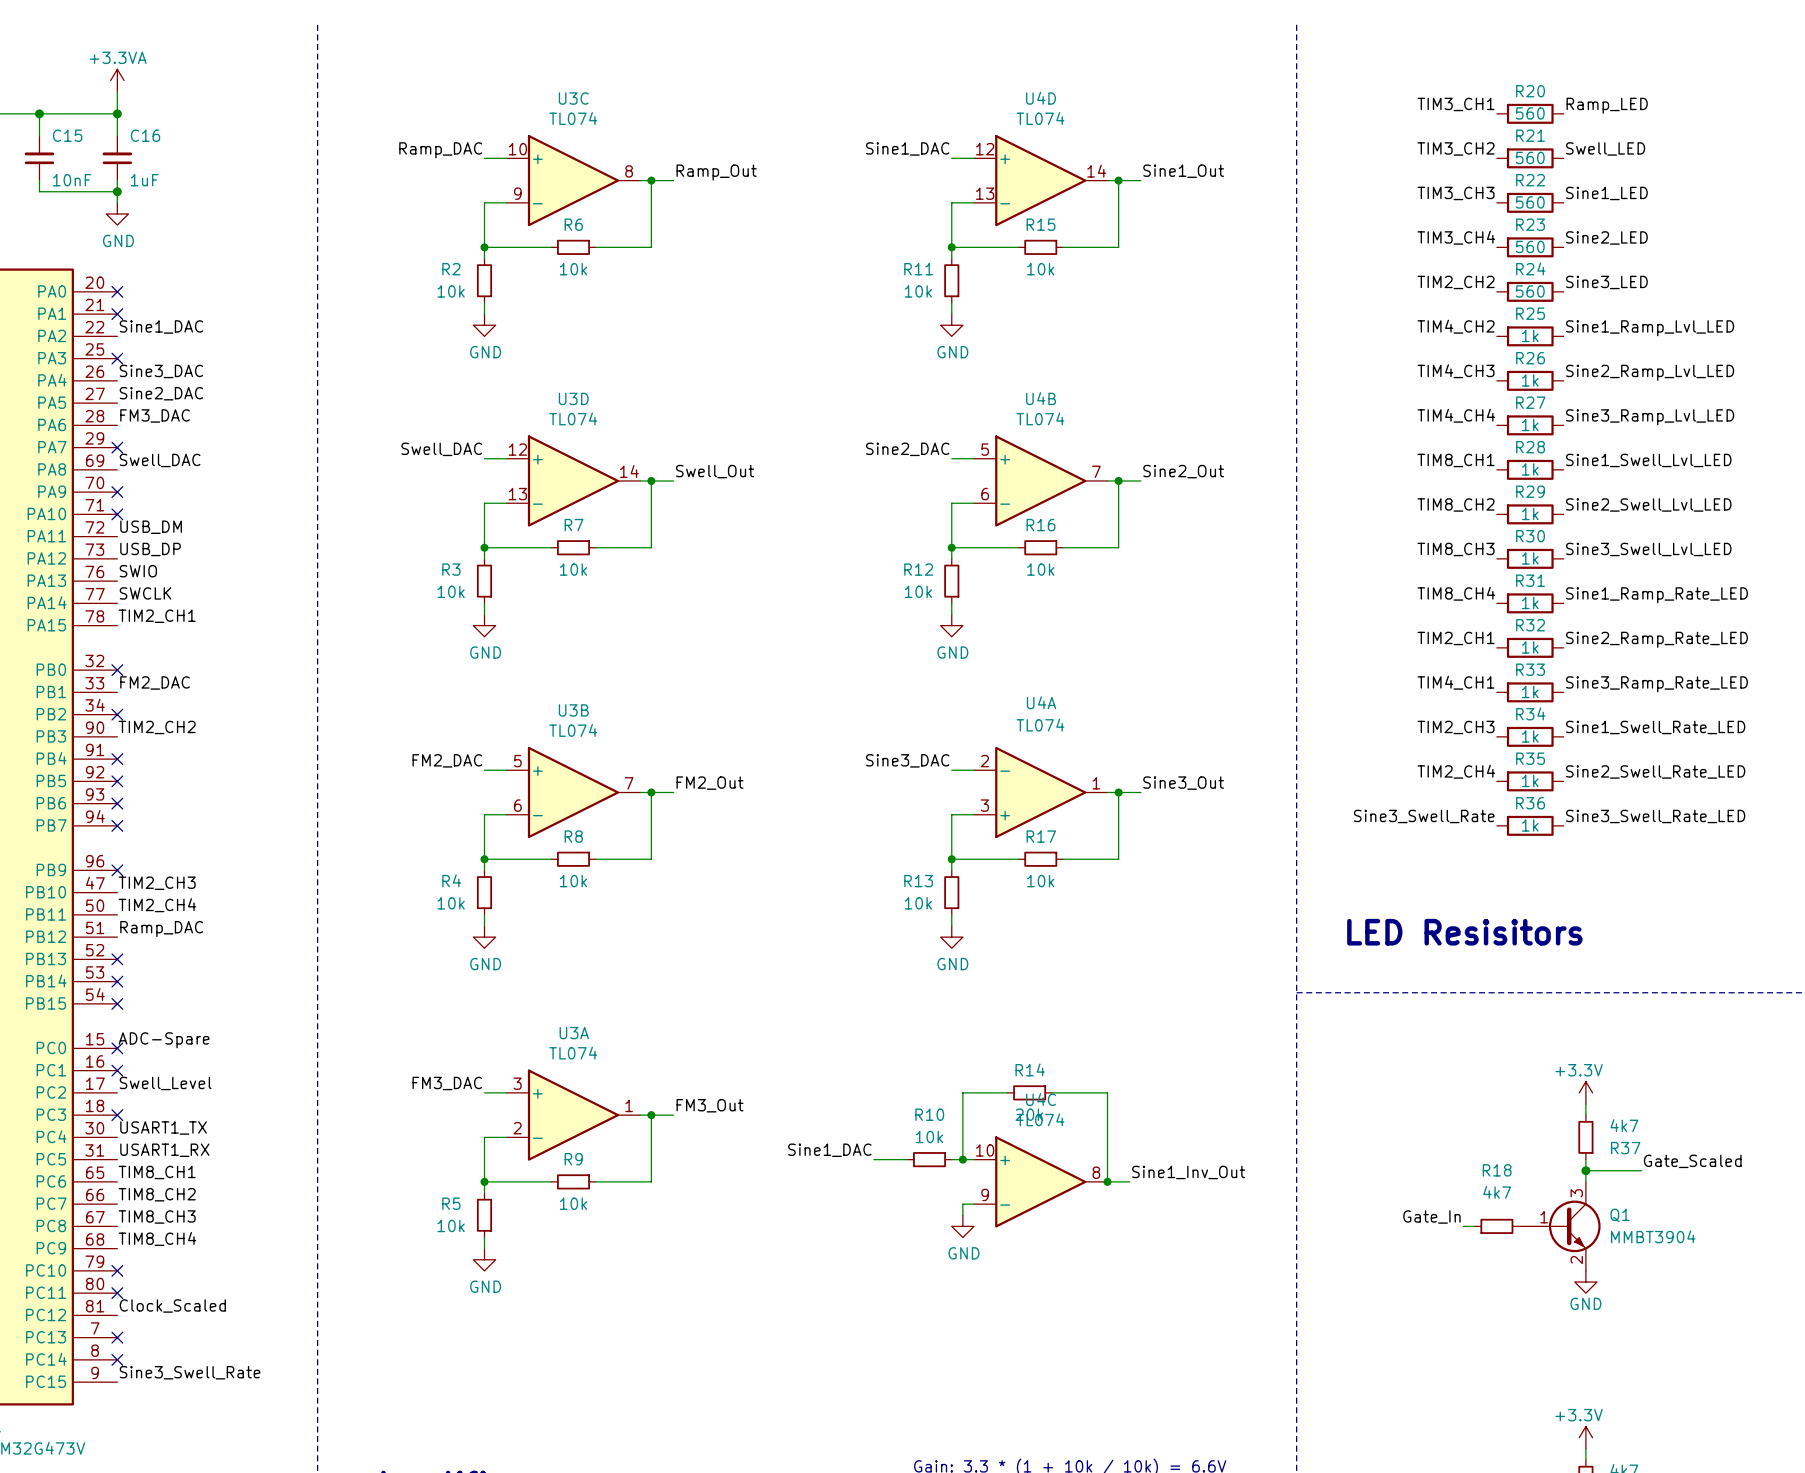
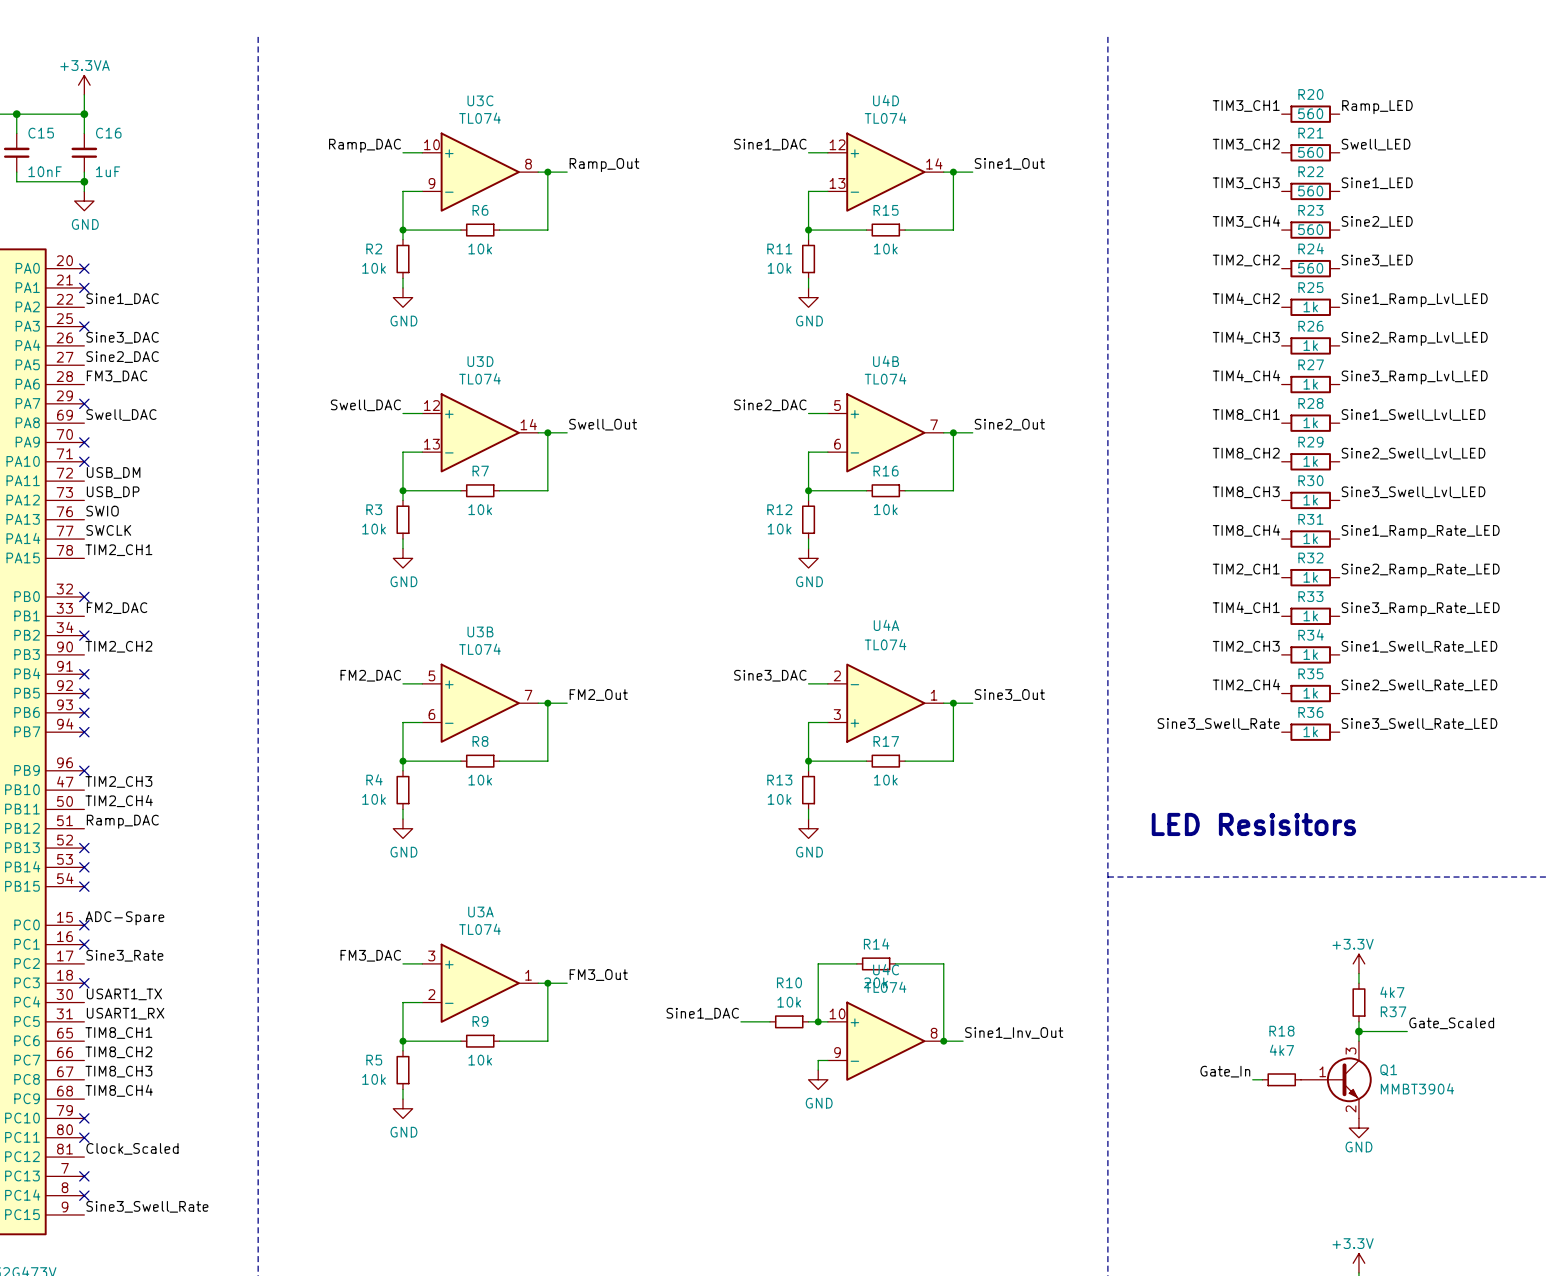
label: Swell_Level (165, 1083) -> Sine3_Rate (124, 955)

